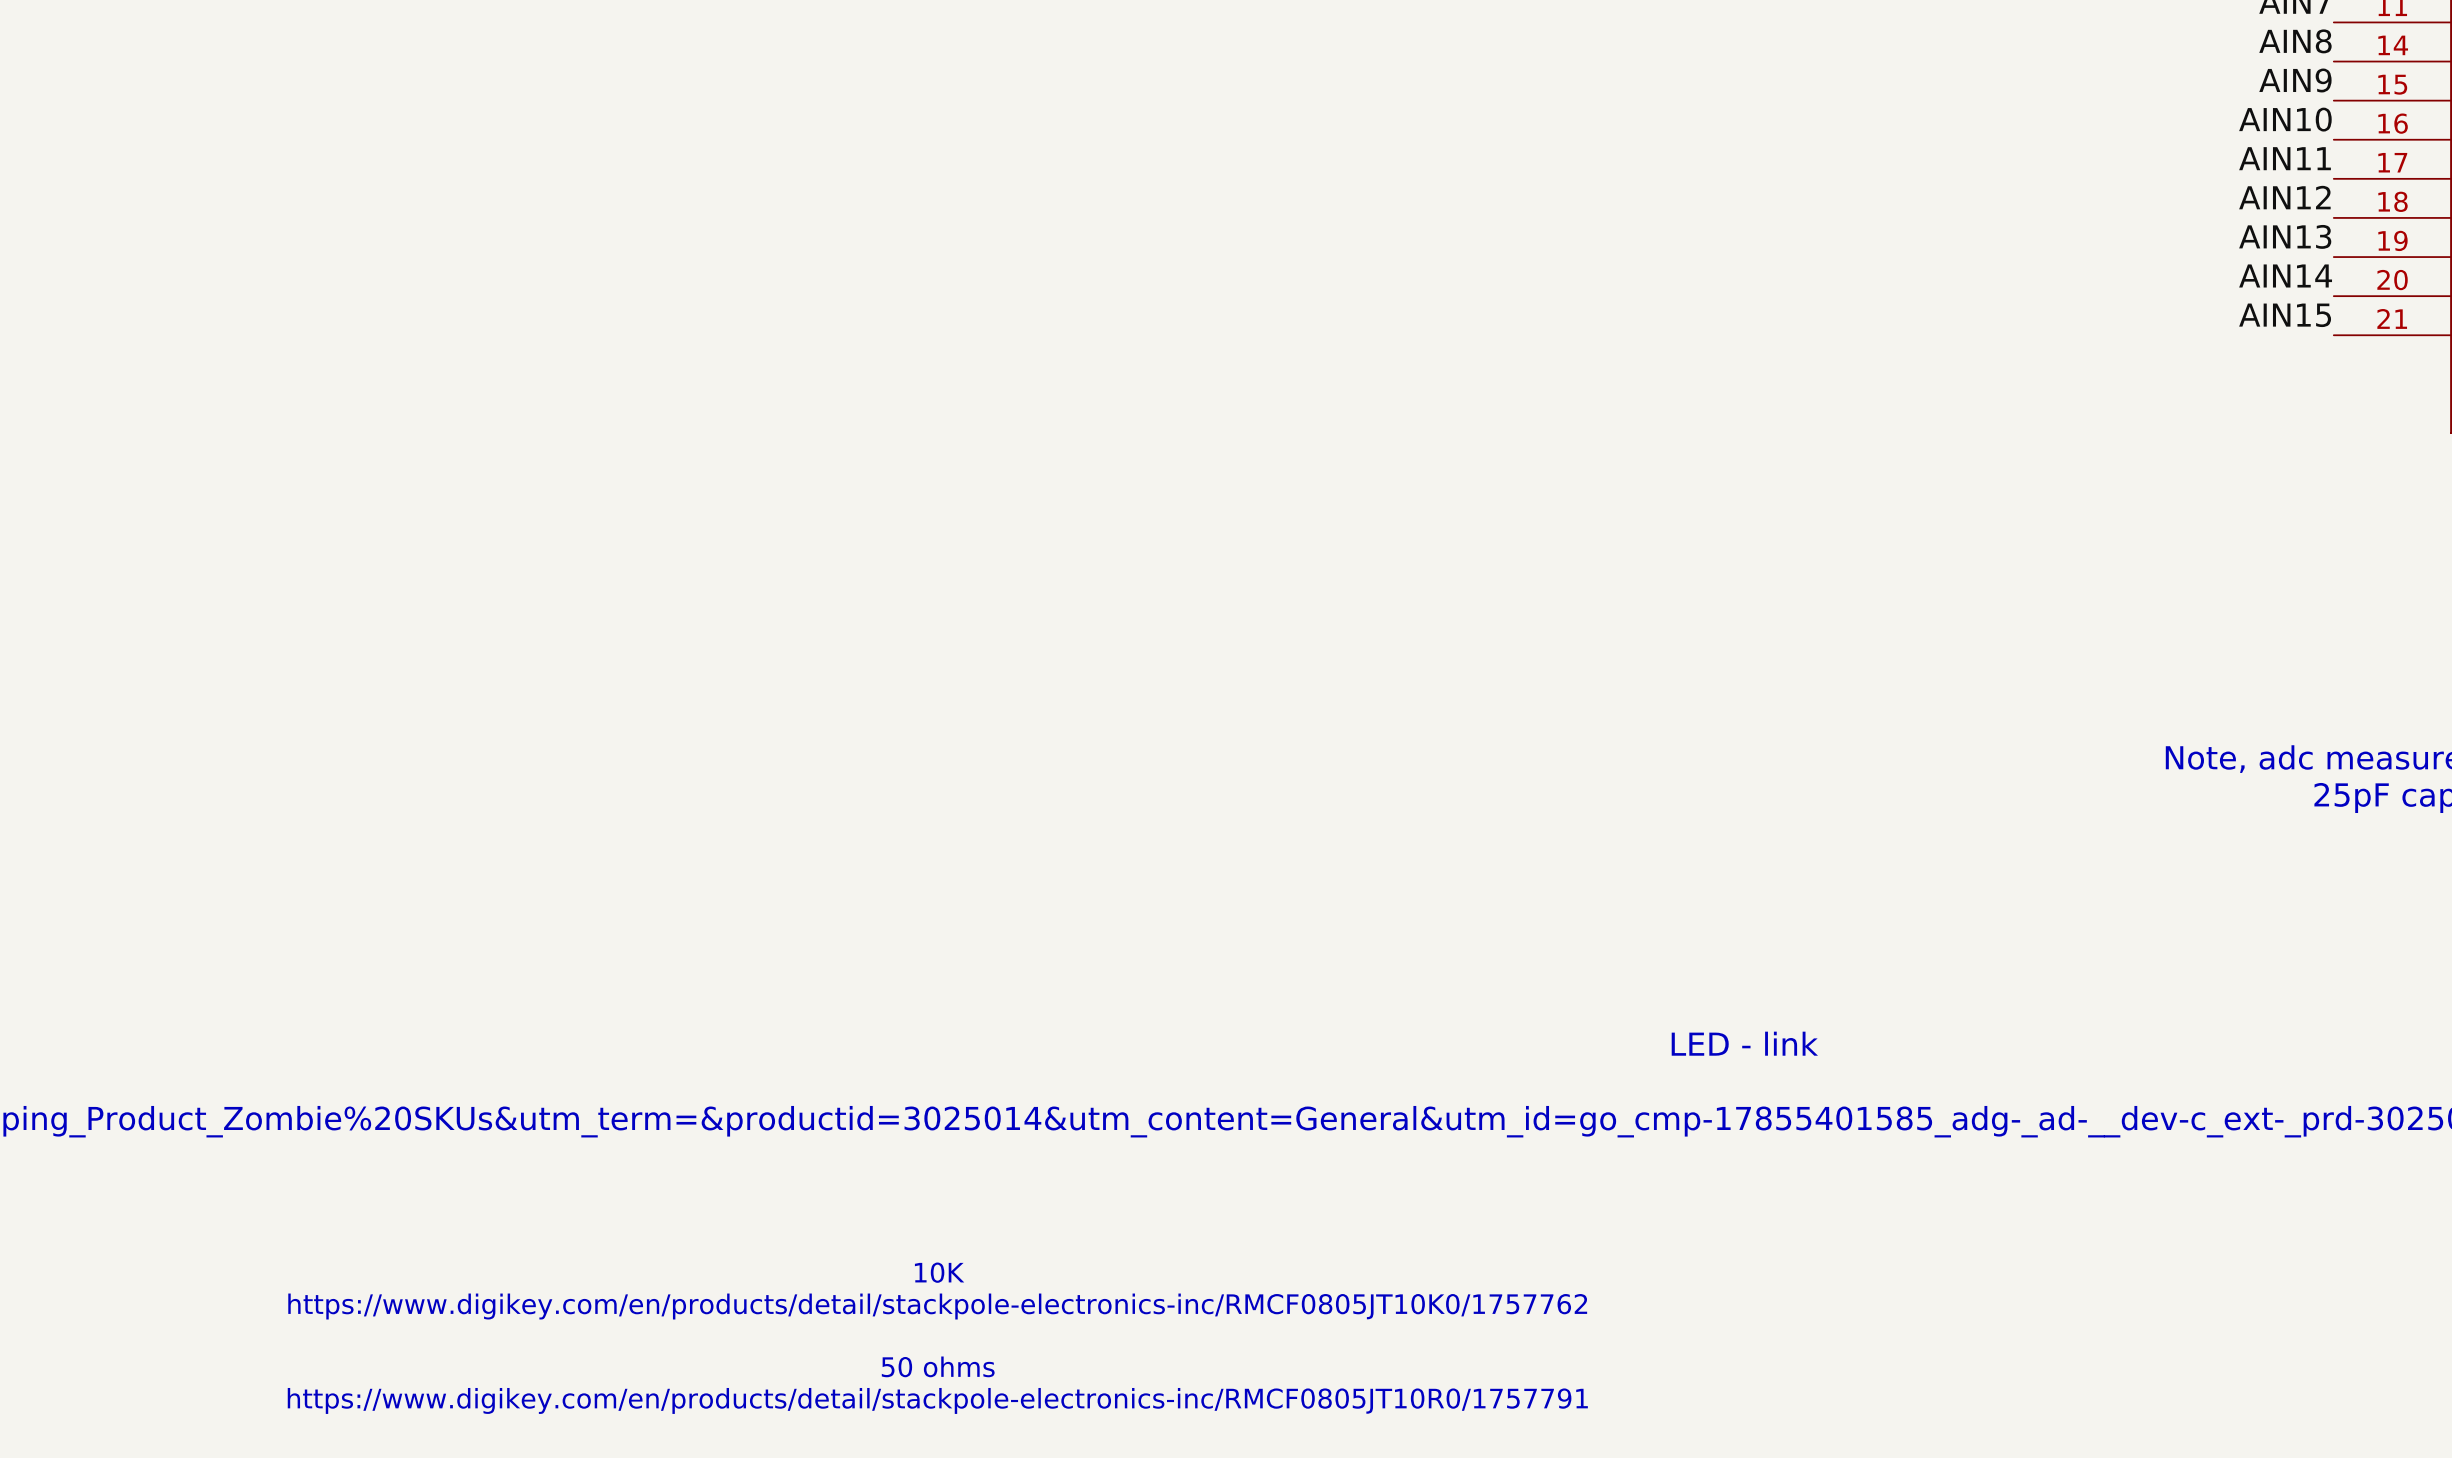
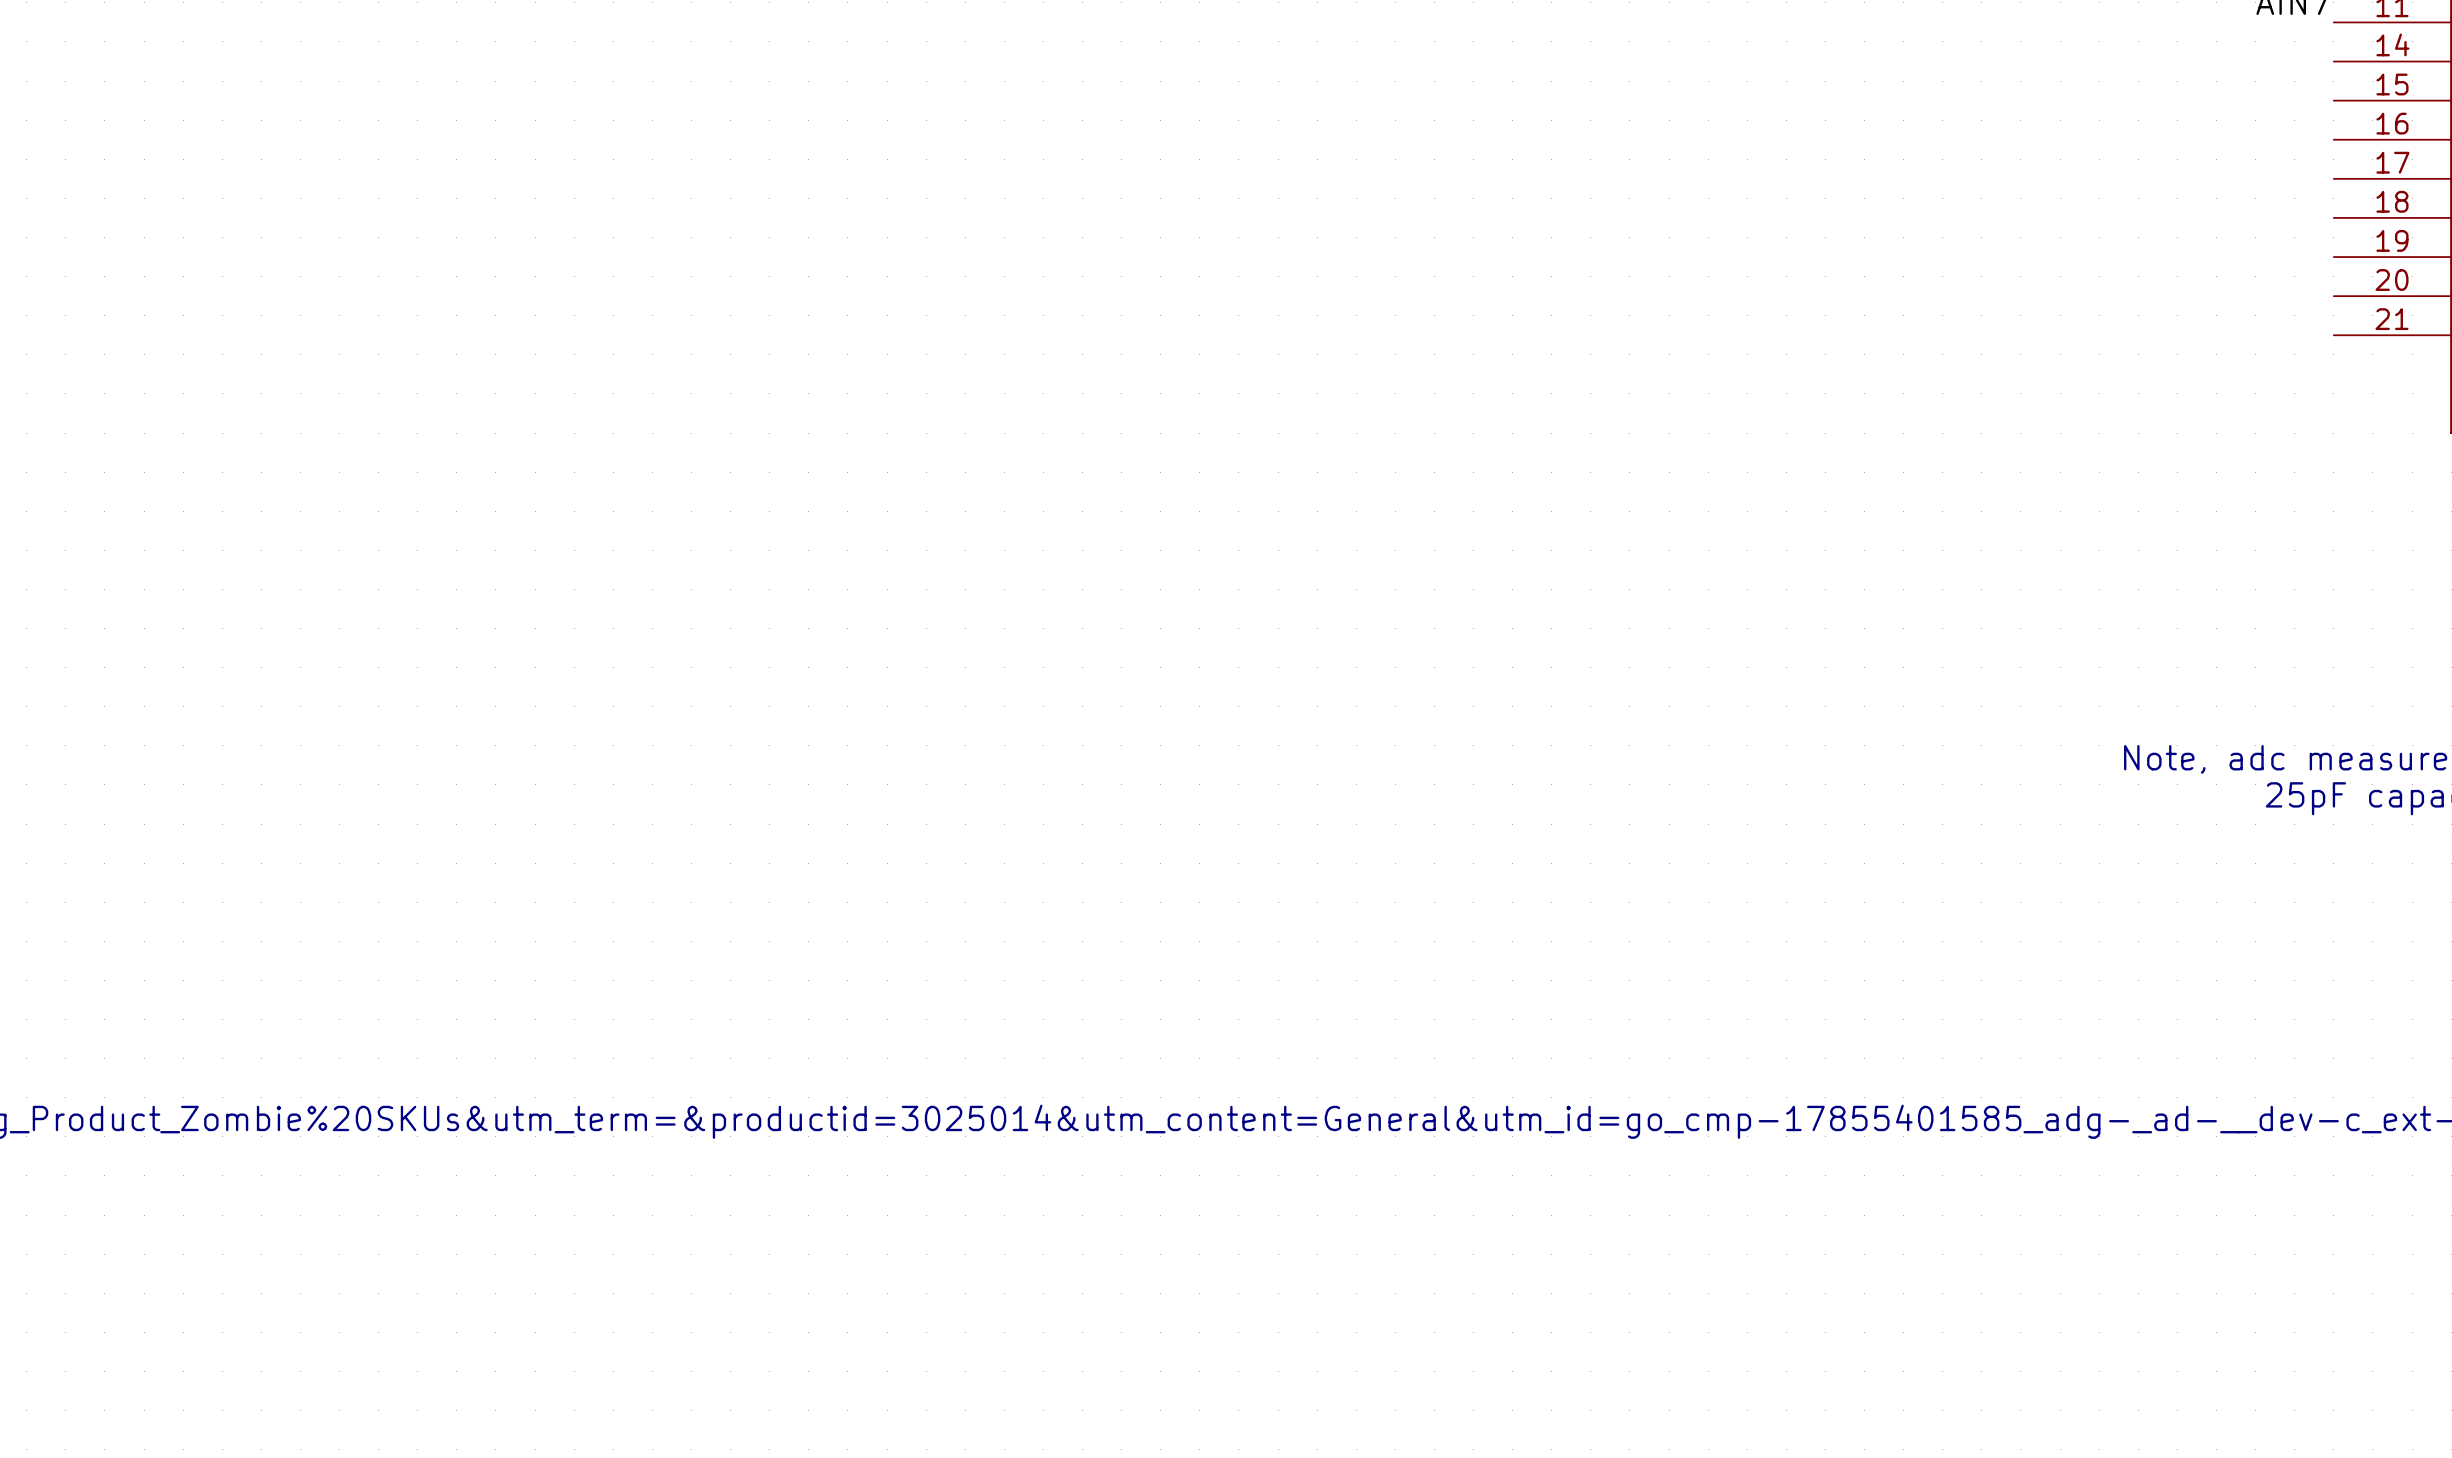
label: AIN8 (2295, 41) -> none
label: AIN9 (2295, 80) -> none
label: AIN10 (2285, 119) -> none
label: AIN11 (2285, 158) -> none
label: AIN12 (2284, 197) -> none
label: AIN13 (2285, 236) -> none
label: AIN14 (2285, 275) -> none
label: AIN15 (2285, 315) -> none
text: LED - link (1744, 1043) -> none
text: 10K (939, 1272) -> none
text: https://www.digikey.com/en/products/detail/stackpole-electronics-inc/RMCF0805JT10K0/1757762 (937, 1306) -> none
text: 50 ohms (938, 1366) -> none
text: https://www.digikey.com/en/products/detail/stackpole-electronics-inc/RMCF0805JT10R0/1757791 (937, 1400) -> none

